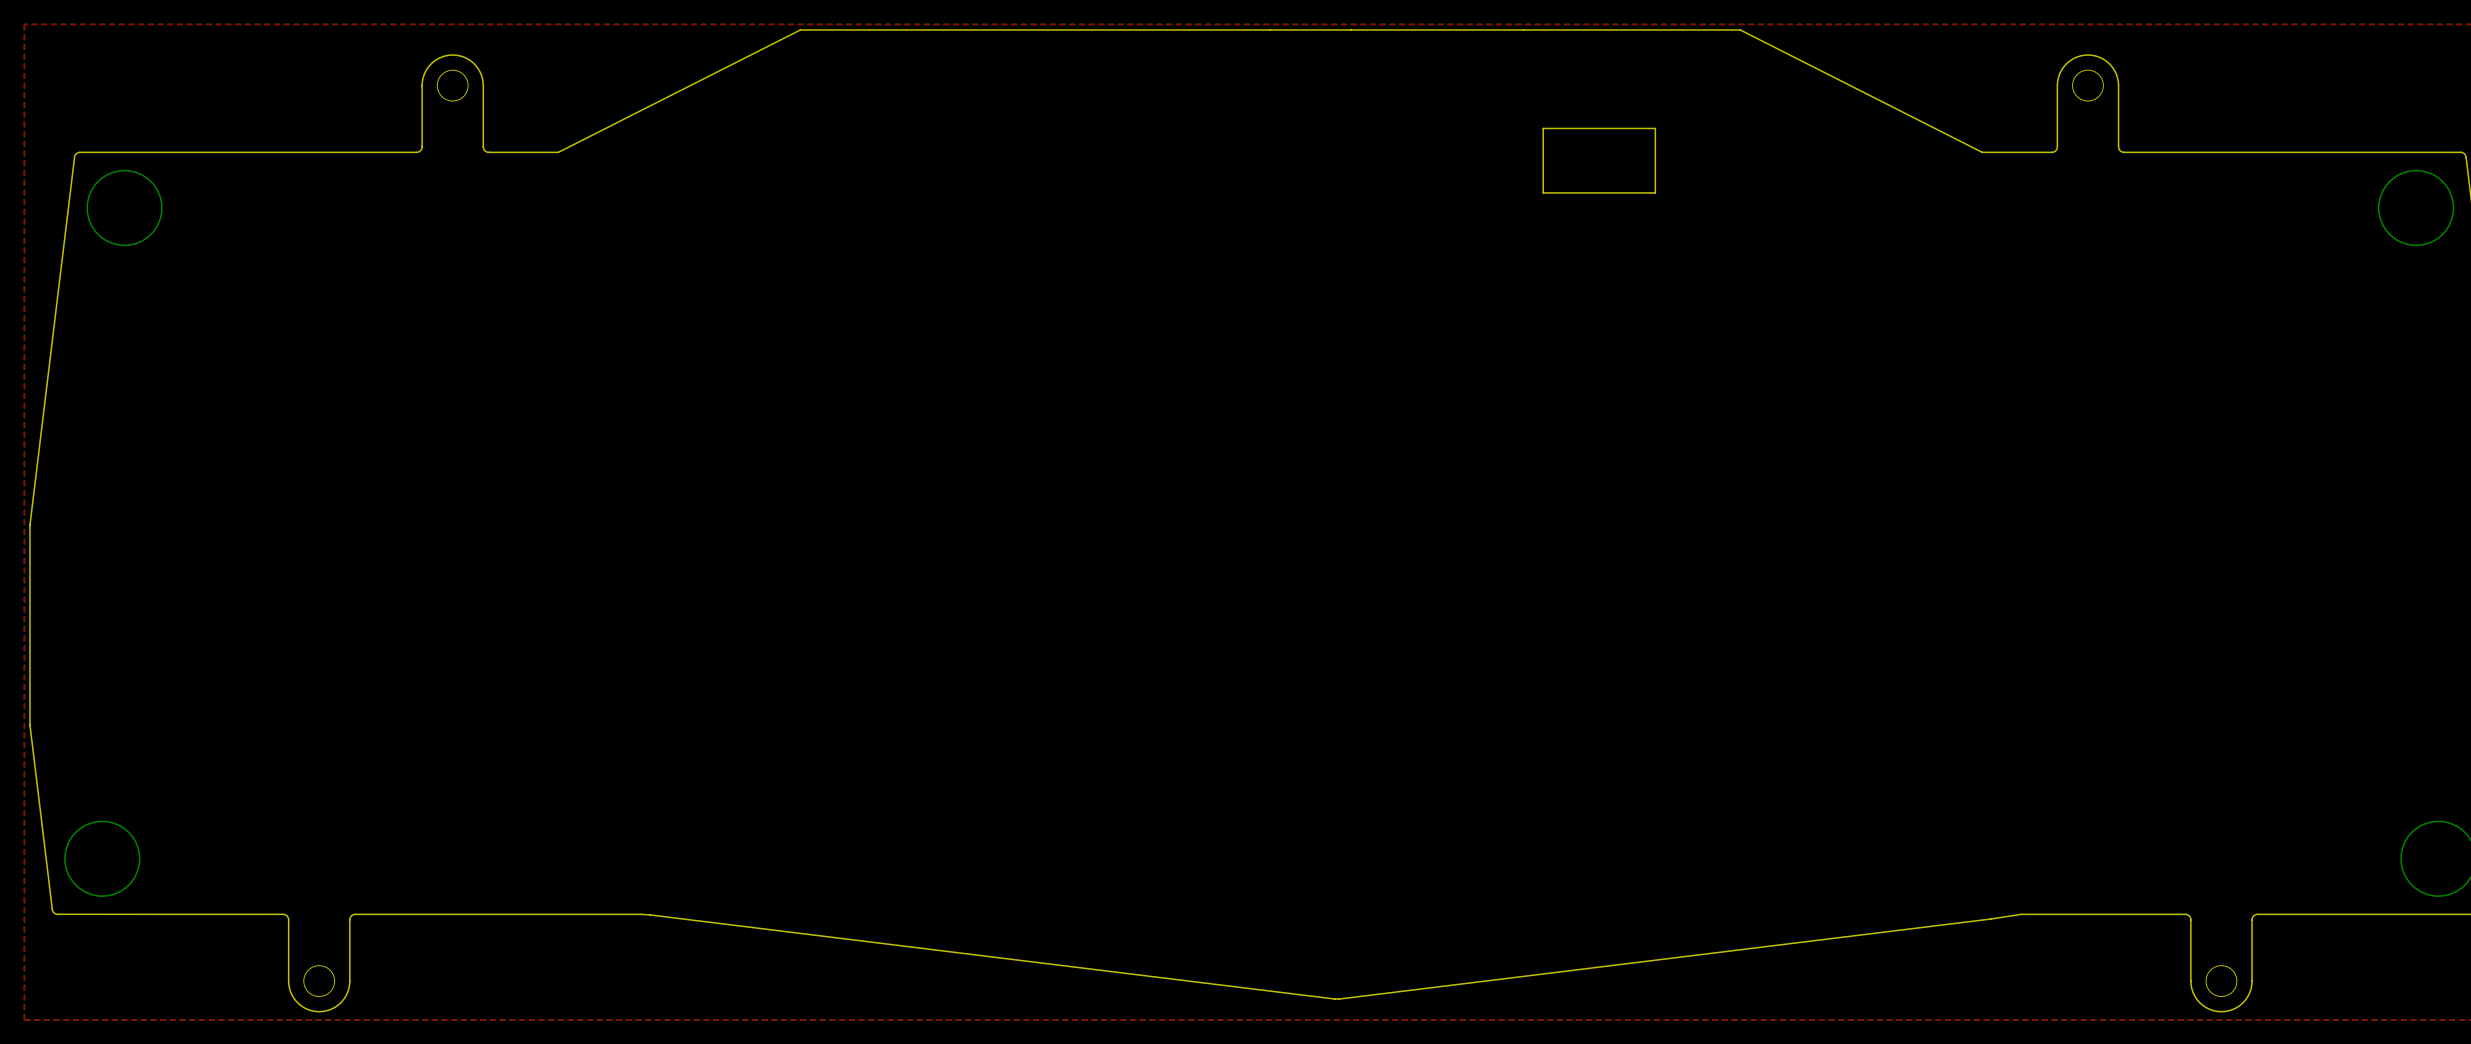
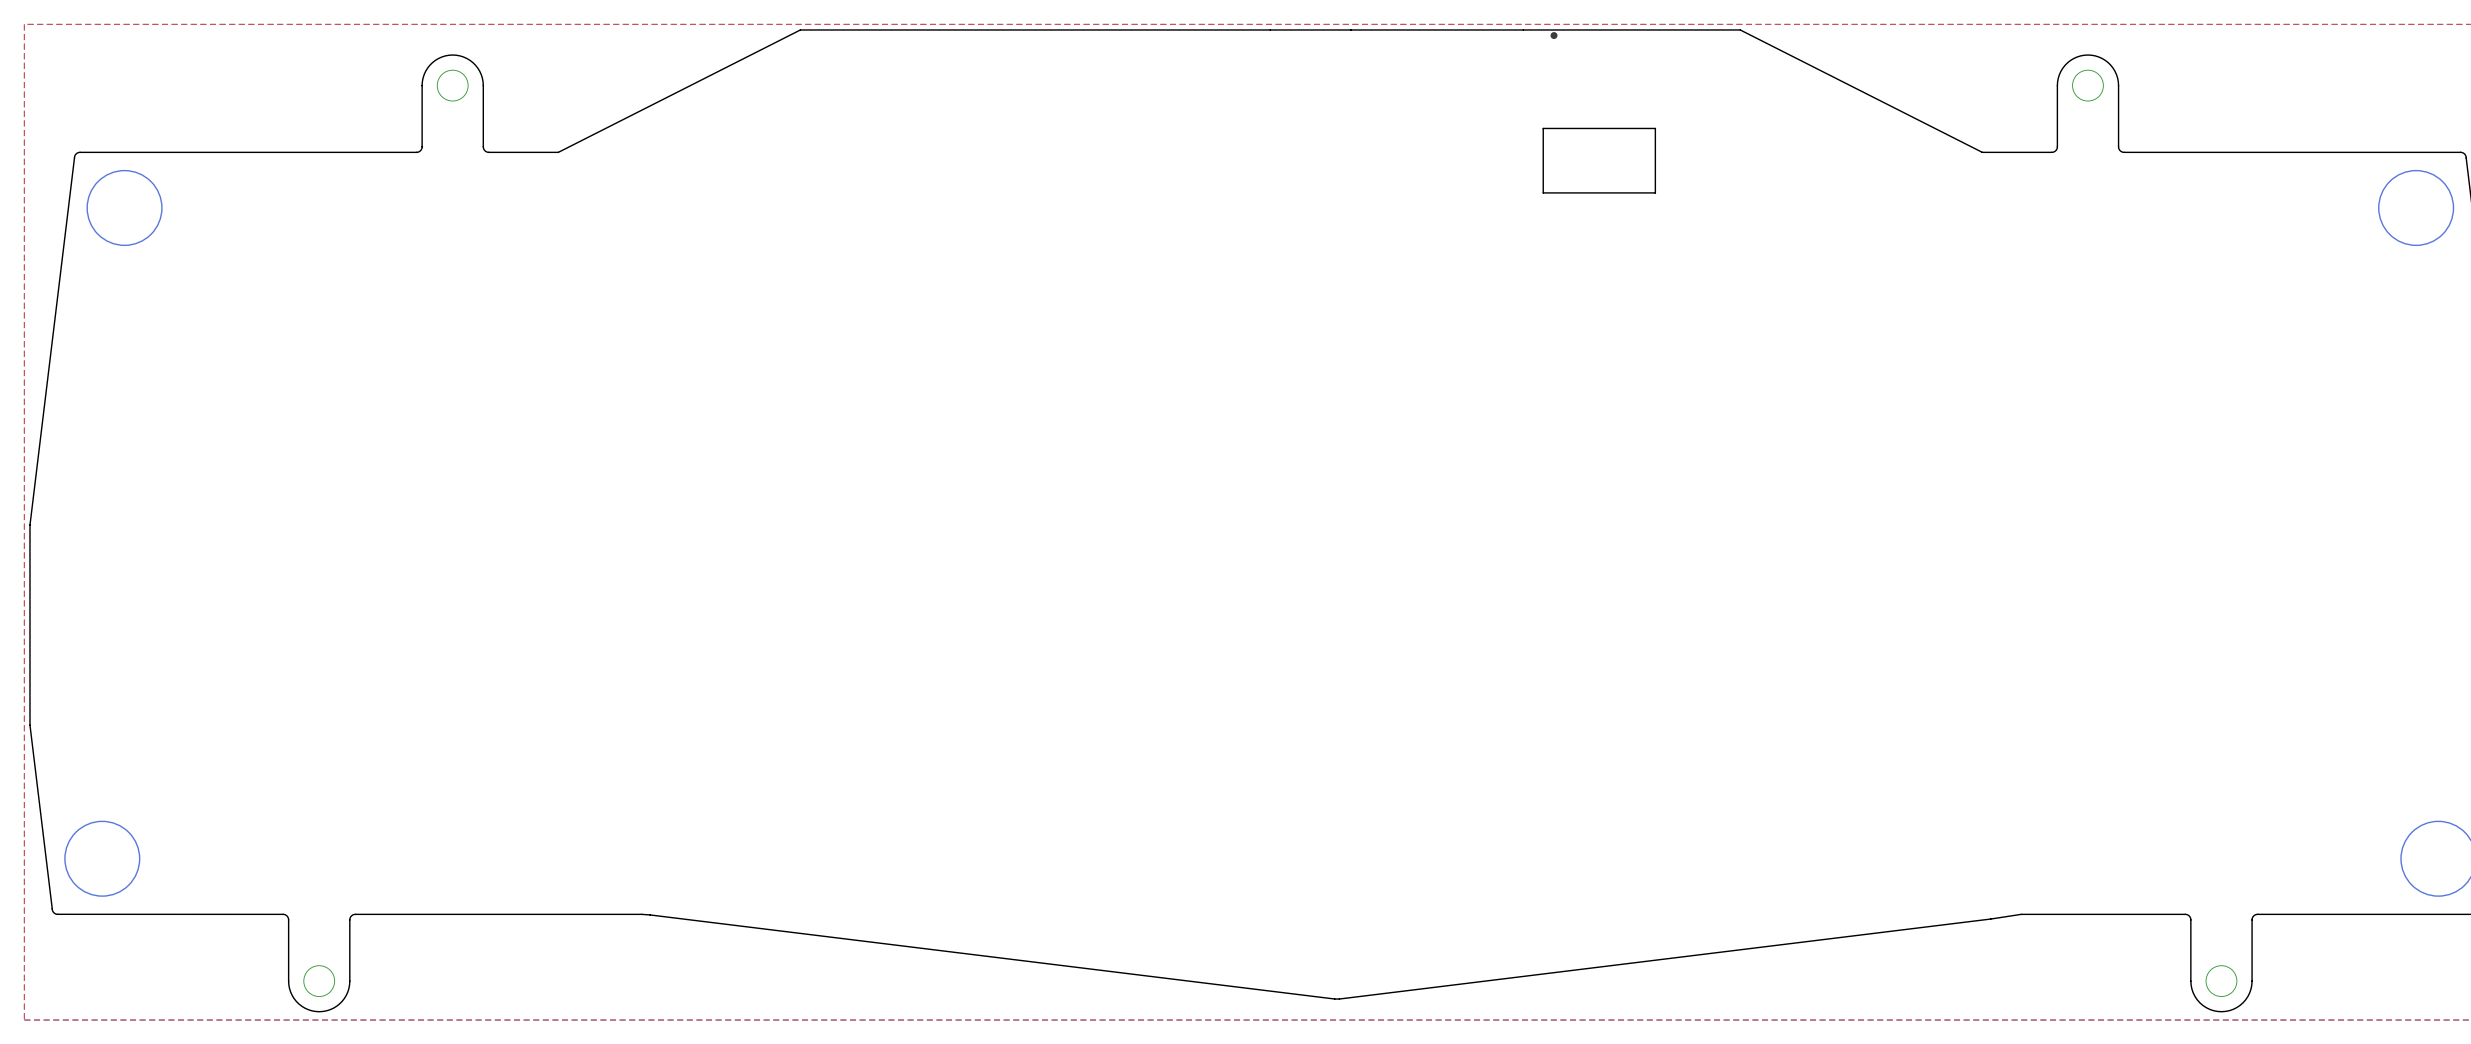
drawing: none -> [1550, 32, 1558, 40]

